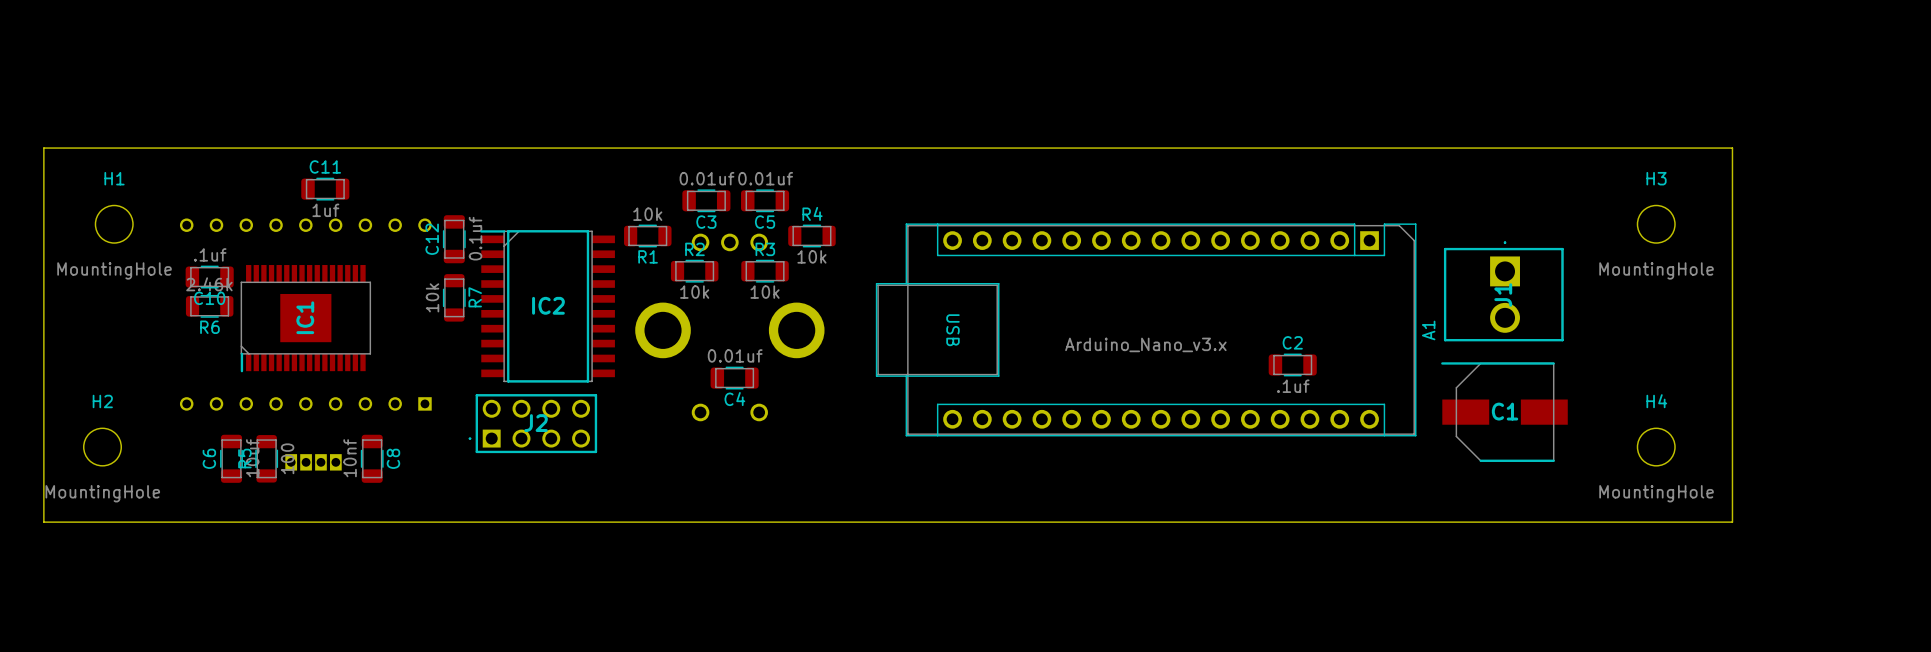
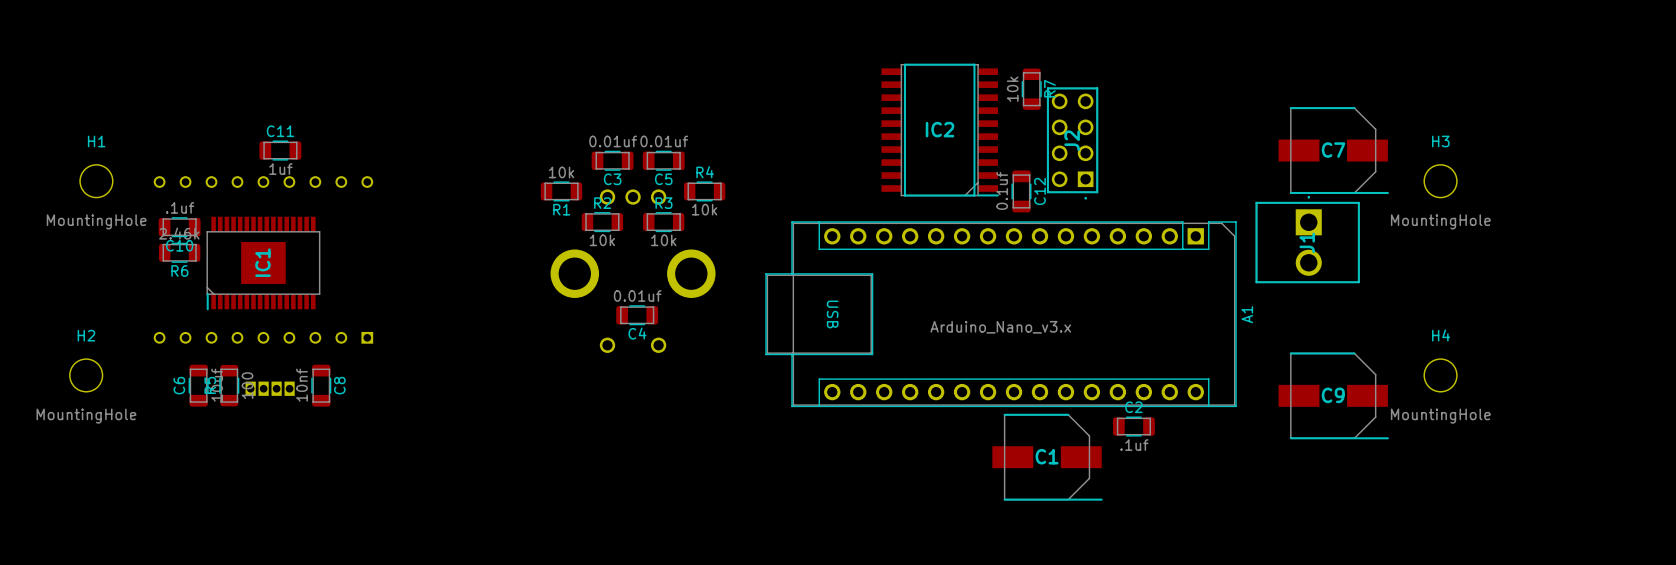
board edge: (43, 148) (1732, 148) (1732, 522) (43, 522) (43, 148) -> none
C7: none -> (1333, 150)
C12 value position: 0.1uf (475, 238) -> 0.1uf (1002, 190)
C12 name position: C12 (432, 239) -> C12 (1040, 191)
C12 position: (454, 239) -> (1021, 191)
R7 position: (454, 297) -> (1031, 89)
IC2 rotation: 0° (547, 306) -> 180° (940, 130)
IC2 position: (547, 306) -> (940, 130)
A1 position: (1146, 329) -> (1001, 314)
C2 position: (1292, 364) -> (1133, 426)
C1 rotation: 0° (1504, 412) -> 180° (1047, 457)
C1 position: (1504, 412) -> (1047, 457)
J2 rotation: 0° (532, 423) -> 90° counterclockwise (1072, 143)
J2 position: (532, 423) -> (1072, 143)
C9: none -> (1333, 395)

